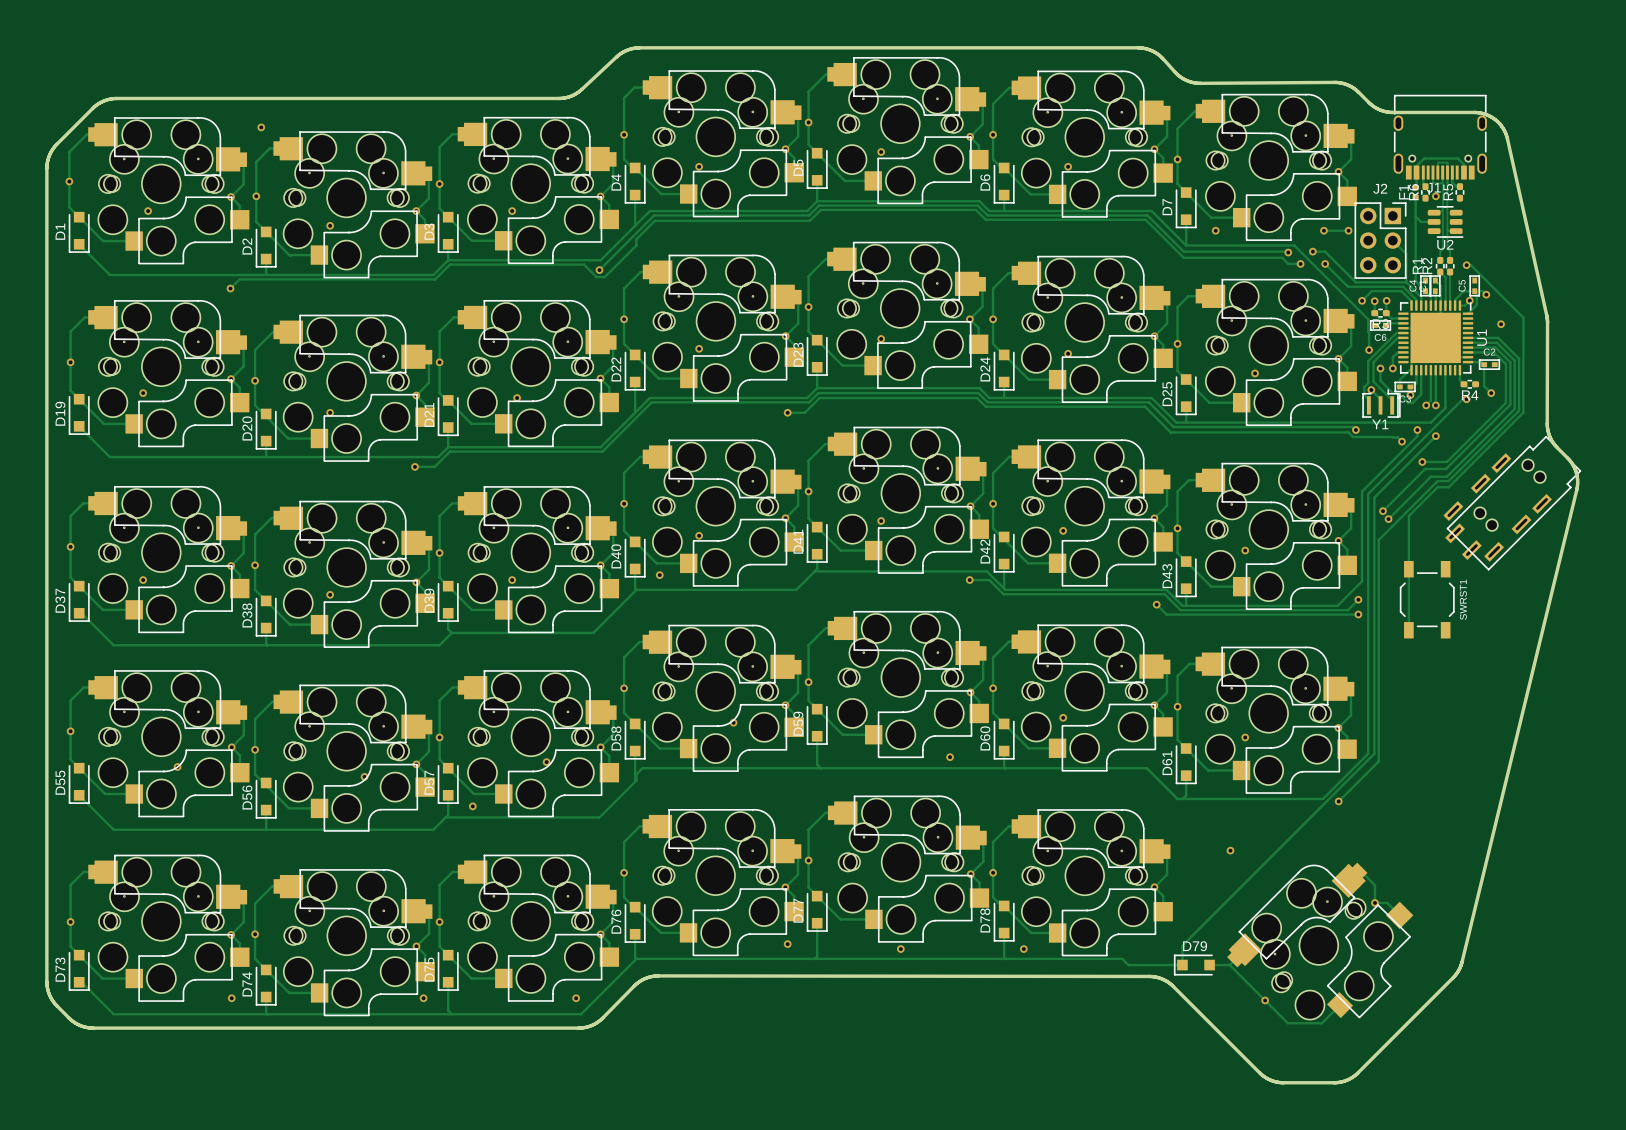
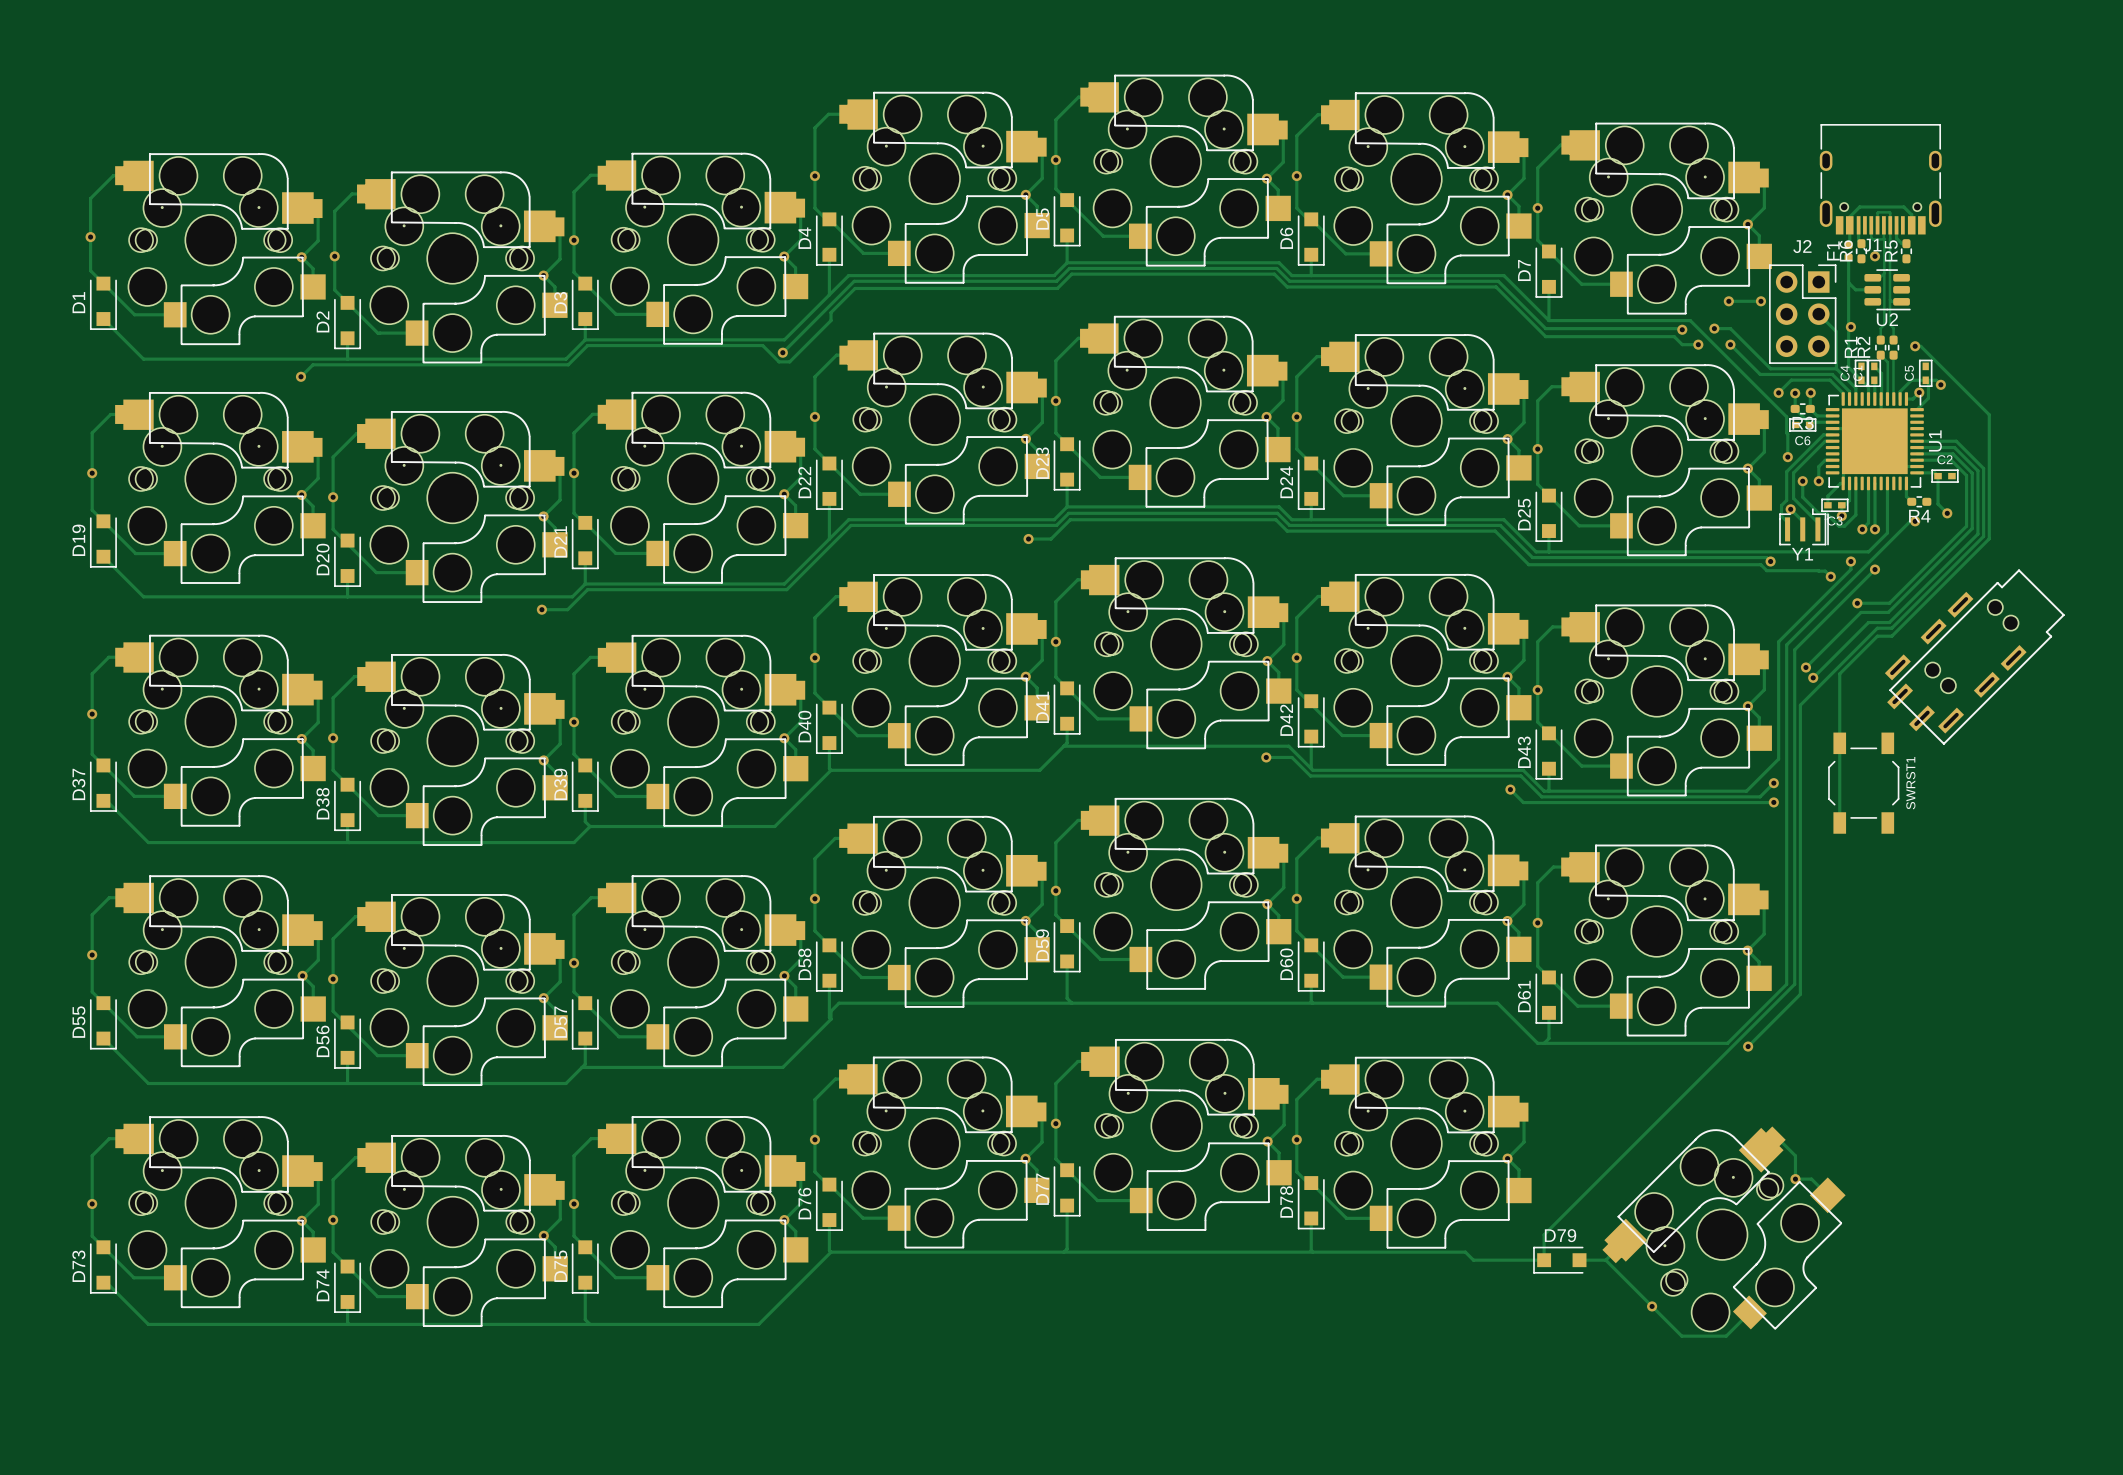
board edge: (638, 47) (1141, 48) (1156, 53) (1179, 75) (1193, 82) (1339, 82) (1353, 88) (1372, 105) (1384, 111) (1478, 112) (1492, 117) (1502, 127) (1507, 139) (1547, 318) (1547, 430) (1553, 443) (1574, 467) (1577, 477) (1577, 488) (1460, 966) (1453, 977) (1352, 1077) (1335, 1082) (1281, 1082) (1269, 1079) (1259, 1072) (1172, 985) (1162, 979) (1150, 976) (655, 976) (636, 983) (597, 1022) (578, 1028) (91, 1028) (72, 1021) (52, 1000) (46, 981) (46, 168) (51, 150) (93, 107) (110, 99) (561, 98) (579, 91) (621, 53) (638, 47) -> none
via: (261, 127) -> none
via: (881, 152) -> none
via: (699, 166) -> none
via: (1068, 166) -> none
via: (148, 211) -> none
via: (512, 211) -> none
via: (330, 225) -> none
via: (1215, 230) -> none
via: none -> (1850, 327)
via: (1501, 324) -> none
via: (881, 338) -> none
via: (699, 348) -> none
via: (1068, 353) -> none
via: (1255, 373) -> none
via: (143, 393) -> none
via: (517, 398) -> none
via: (330, 412) -> none
via: (881, 521) -> none
via: (1063, 530) -> none
via: (699, 535) -> none
via: (1245, 550) -> none
via: (659, 575) -> none
via: (143, 580) -> none
via: (512, 580) -> none
via: (330, 594) -> none
via: (1063, 717) -> none
via: (733, 722) -> none
via: (1245, 737) -> none
via: (950, 757) -> none
via: (546, 762) -> none
via: (177, 767) -> none
via: (364, 776) -> none
via: (472, 806) -> none
via: (1230, 850) -> none
via: (787, 944) -> none
via: (900, 949) -> none
via: (1023, 949) -> none
via: (231, 998) -> none
via: (423, 998) -> none
via: (576, 998) -> none

